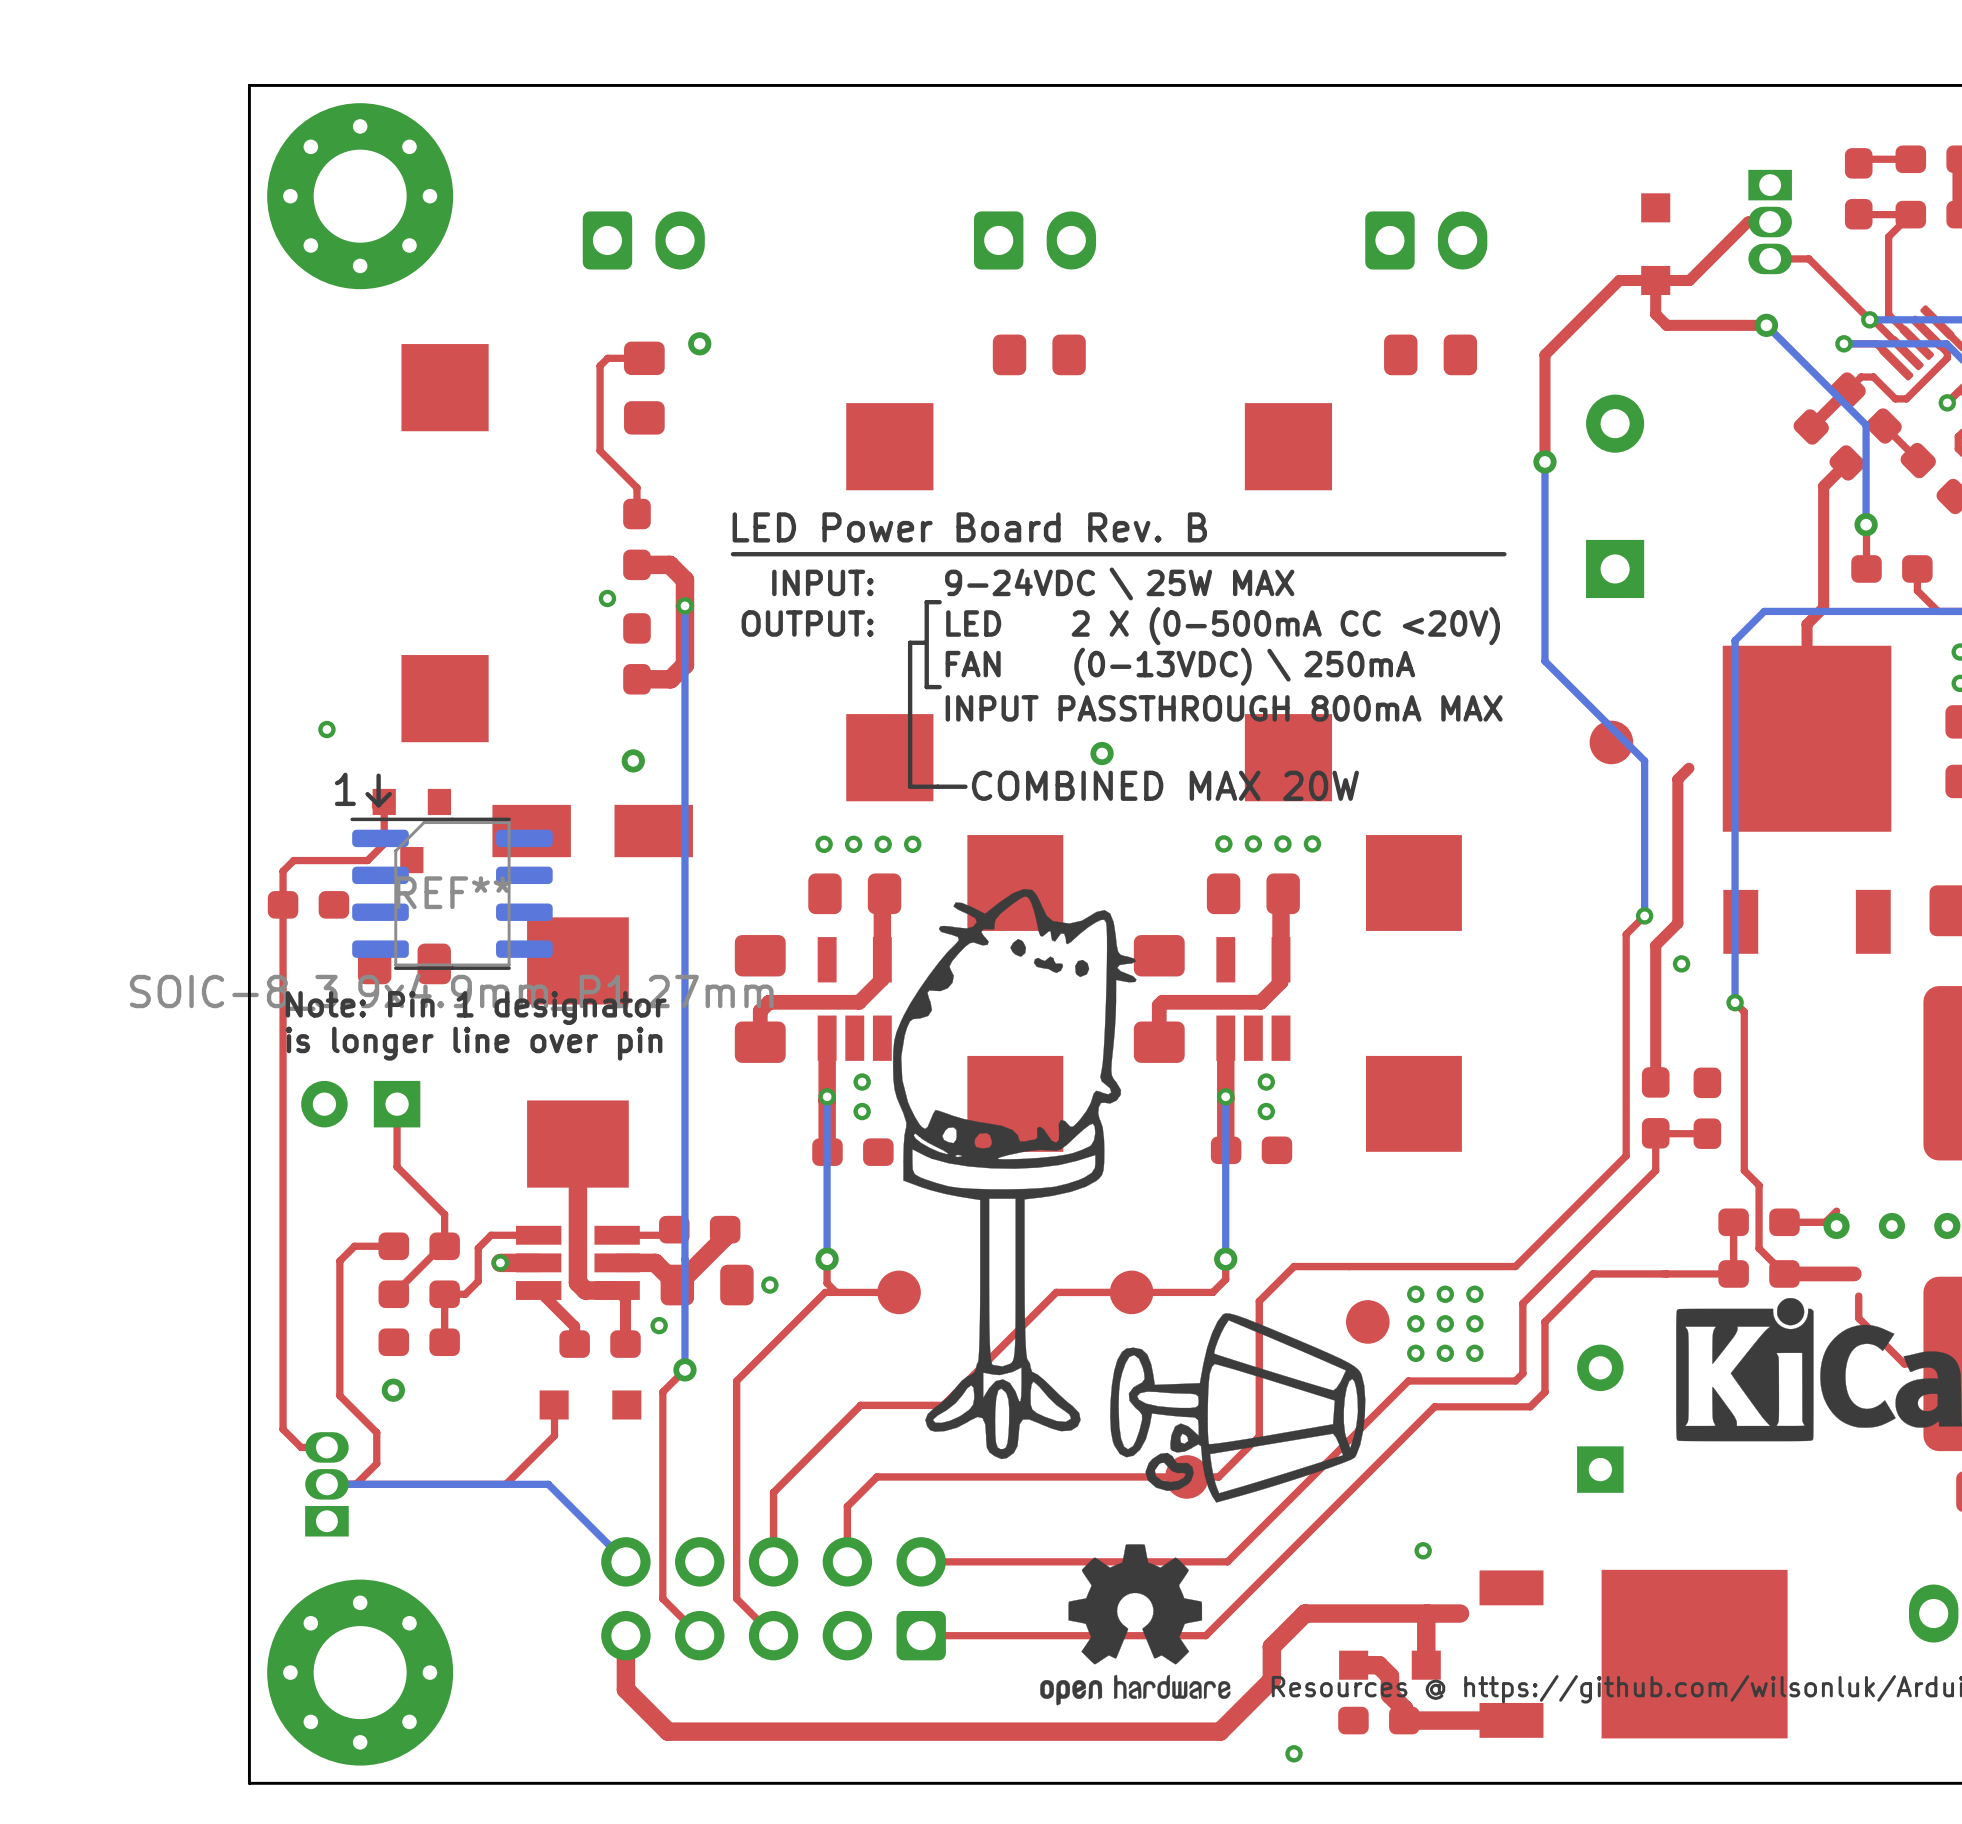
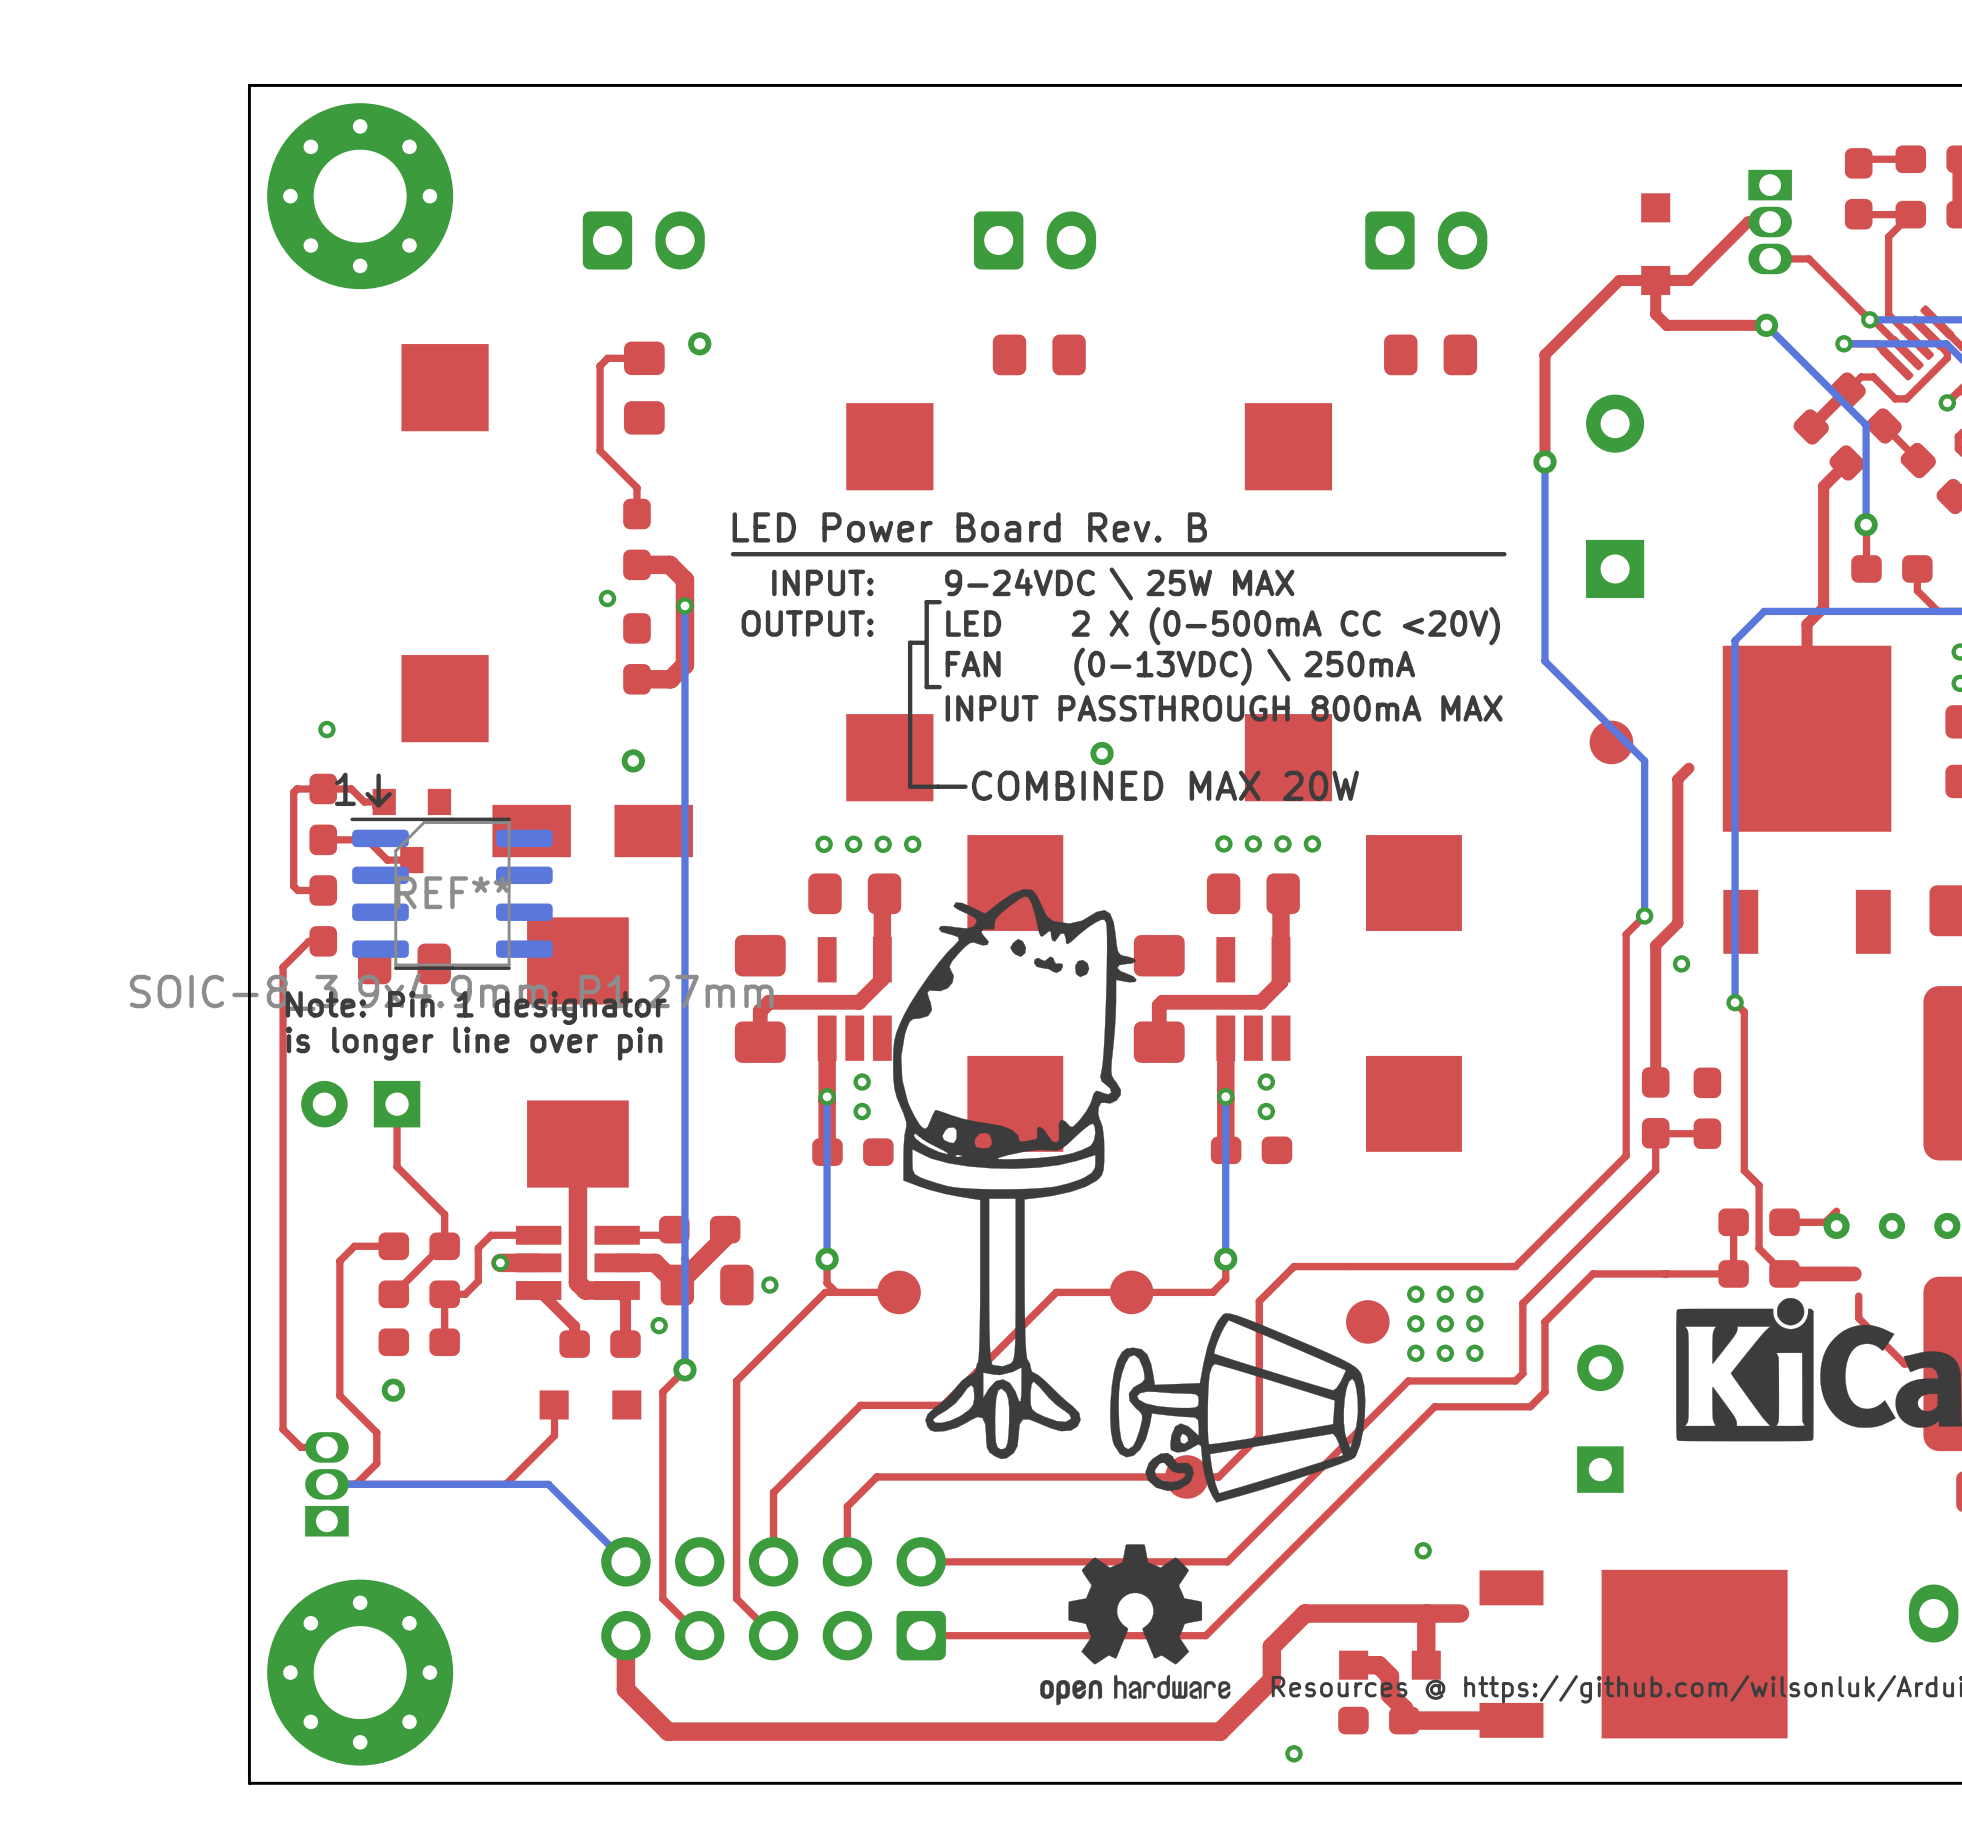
top track: (384, 801) (384, 843) (367, 860) (293, 860) (283, 871) (283, 967) -> (384, 801) (364, 801) (351, 788) (297, 788) (293, 792) (293, 886) (297, 890) (323, 890)
part: none -> (323, 814)
top track: none -> (323, 839) (367, 839) (387, 860) (411, 860)
part rotation: 0° (308, 904) -> 90° clockwise (323, 915)
top track: none -> (323, 941) (308, 941) (283, 967)

